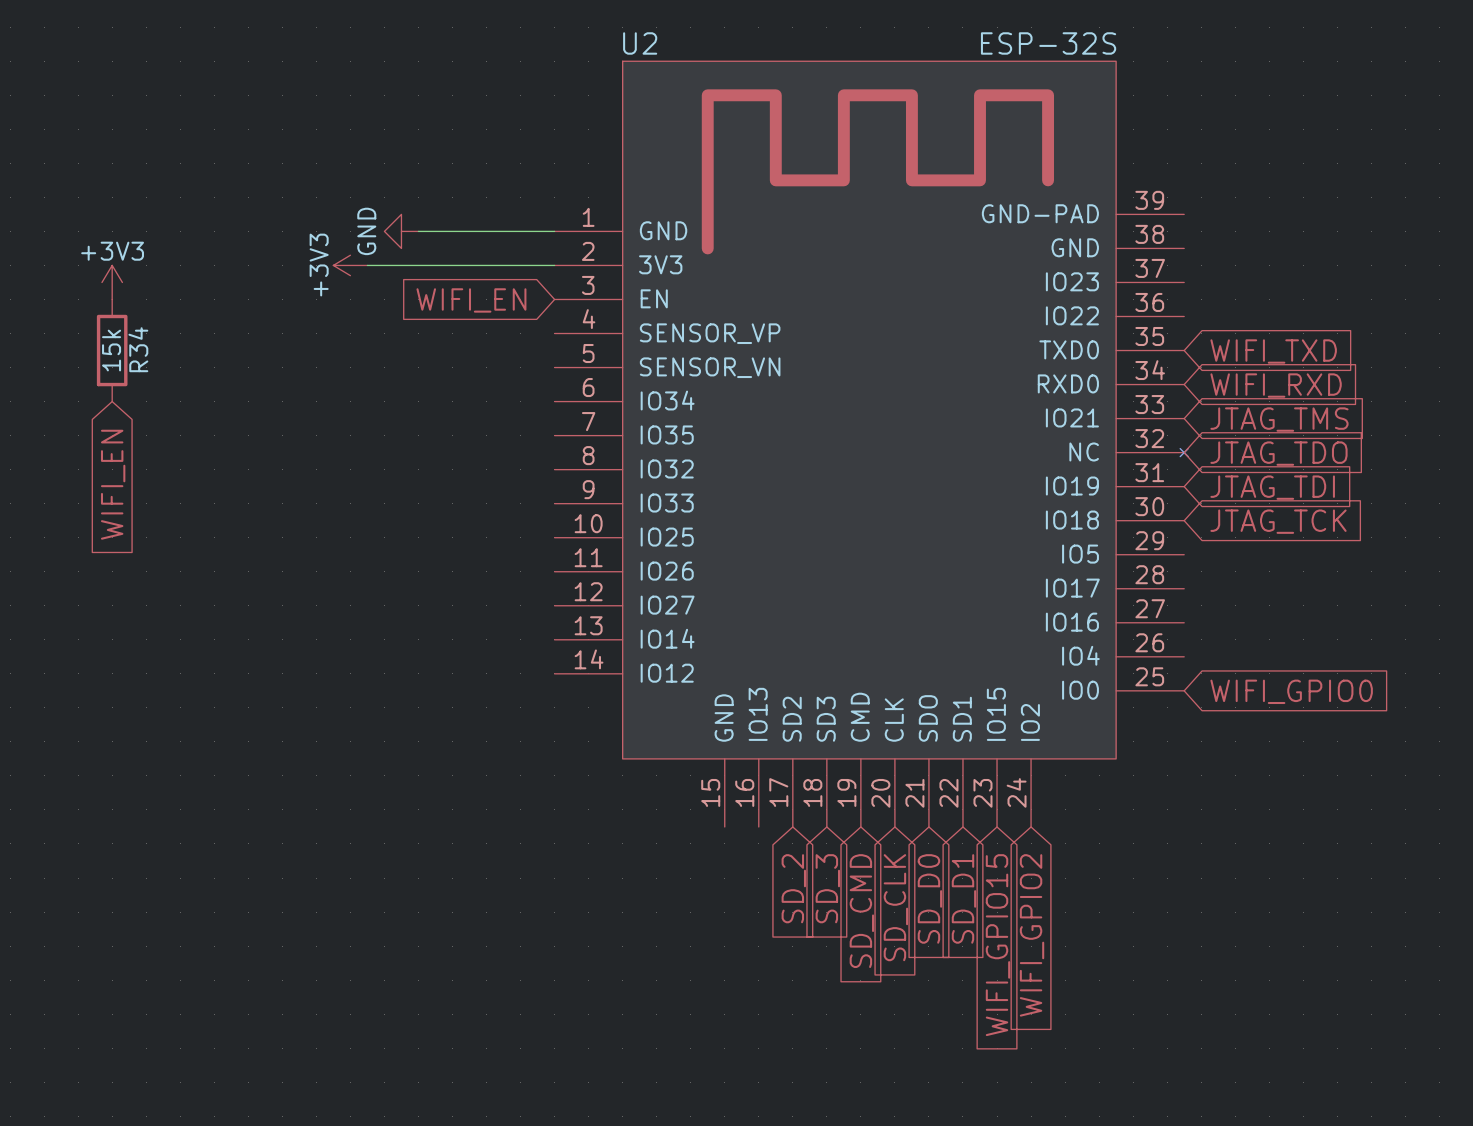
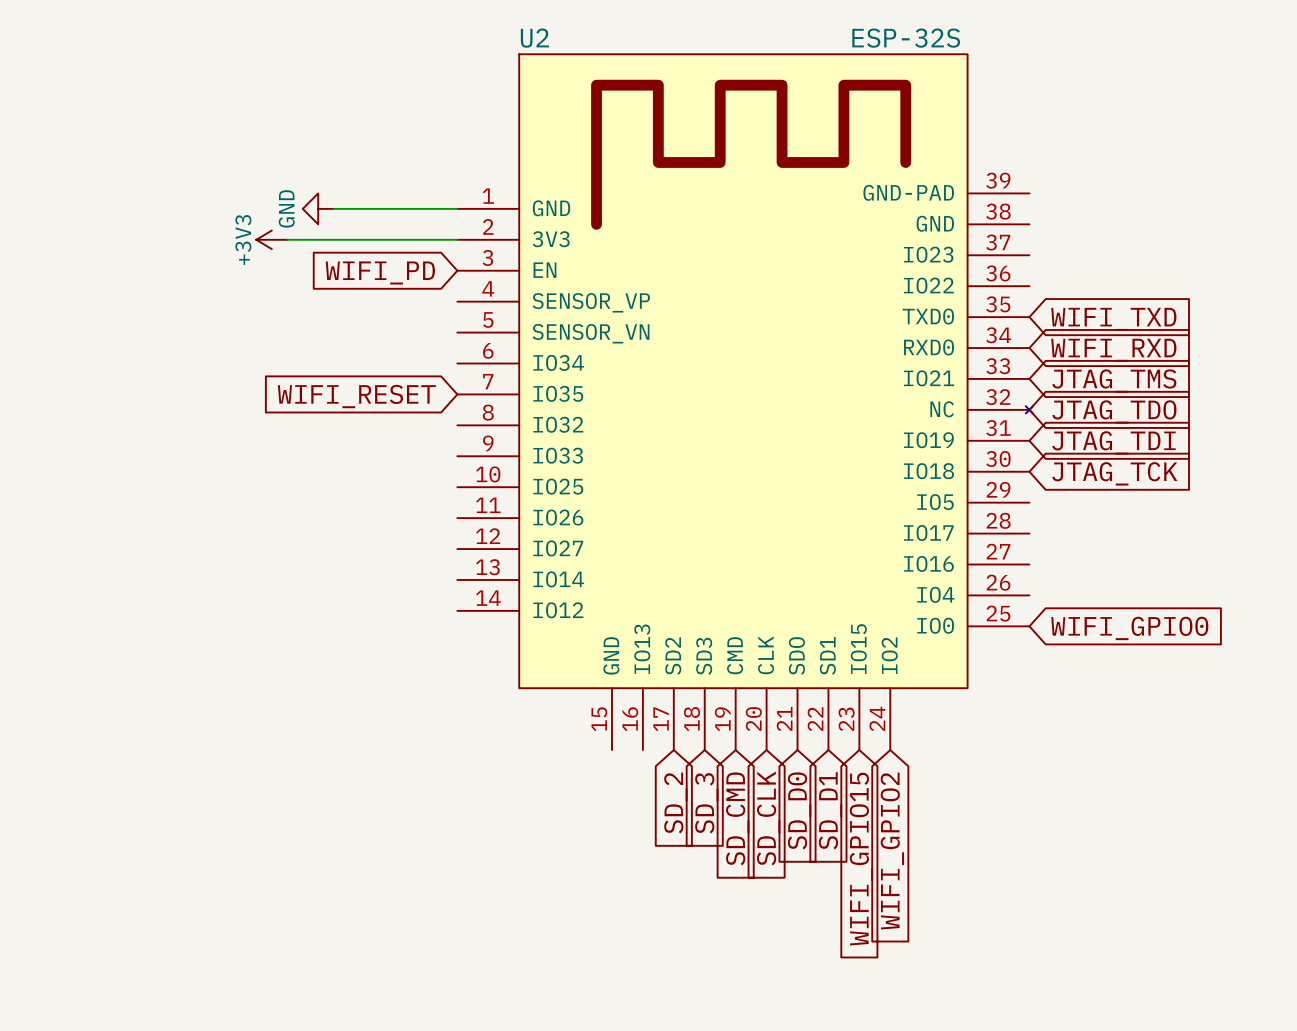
power symbol: +3V3 (112, 282) -> none
global label: WIFI_EN (471, 300) -> WIFI_PD (380, 272)
R34: 15k (112, 350) -> none
global label: none -> WIFI_RESET (356, 396)
global label: WIFI_EN (113, 484) -> none

